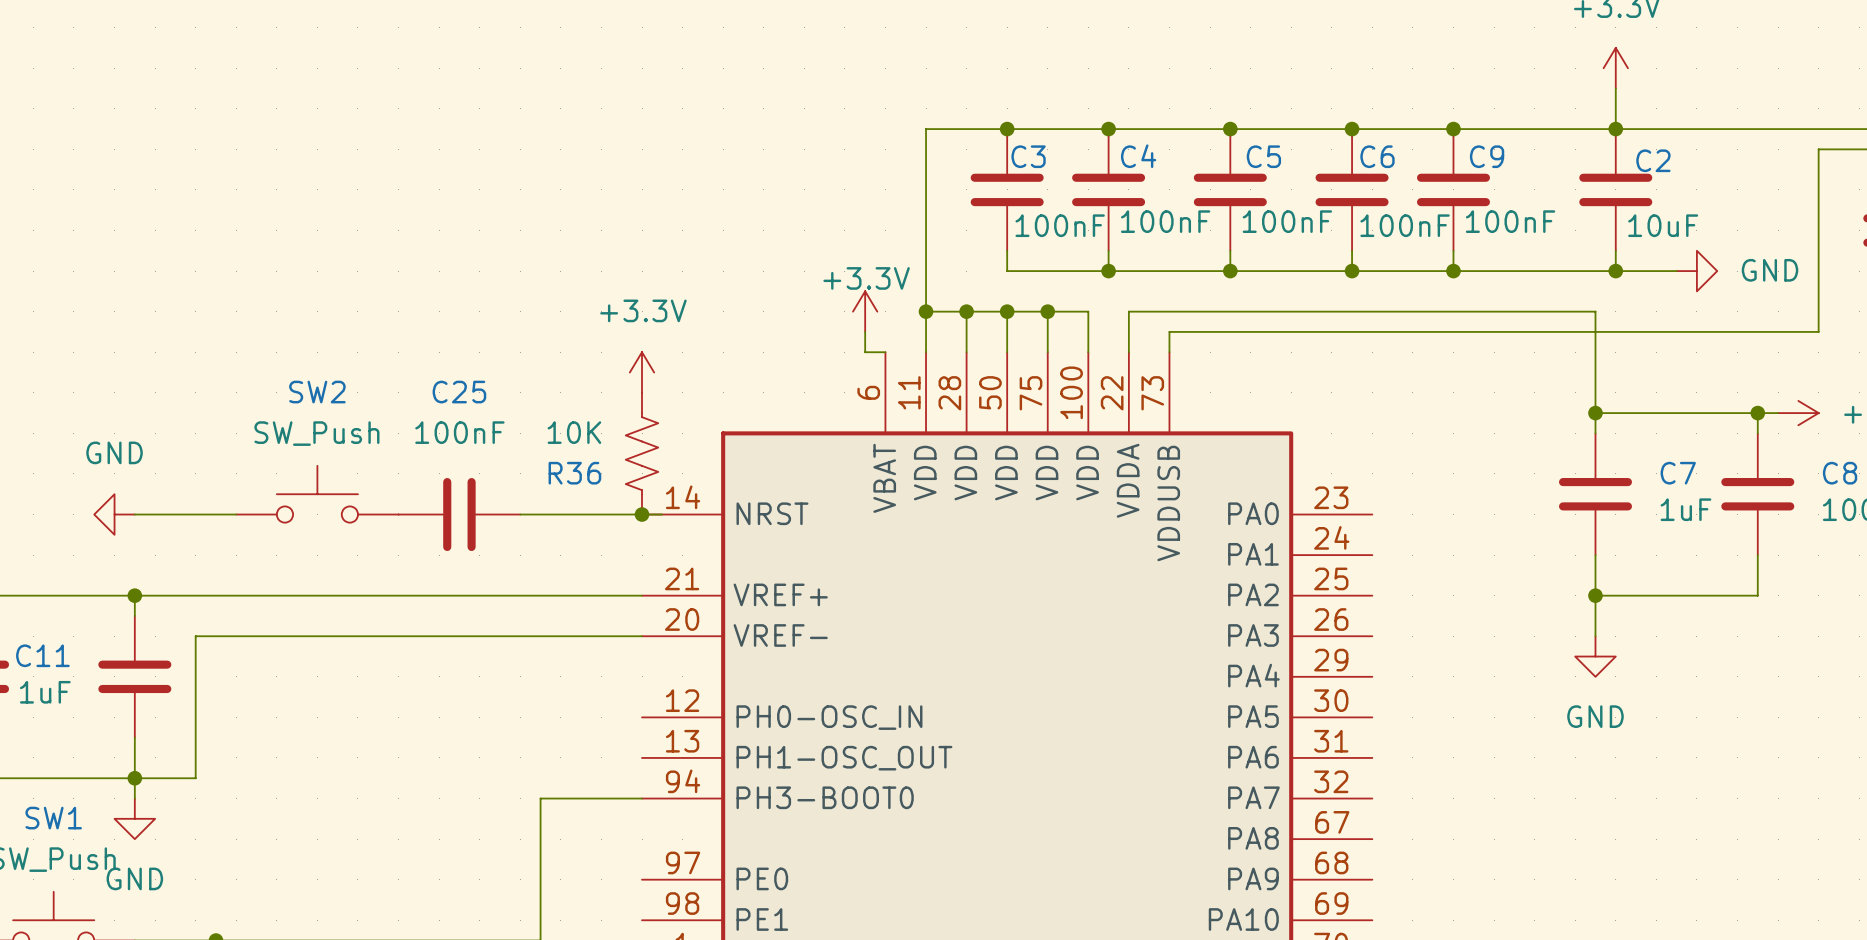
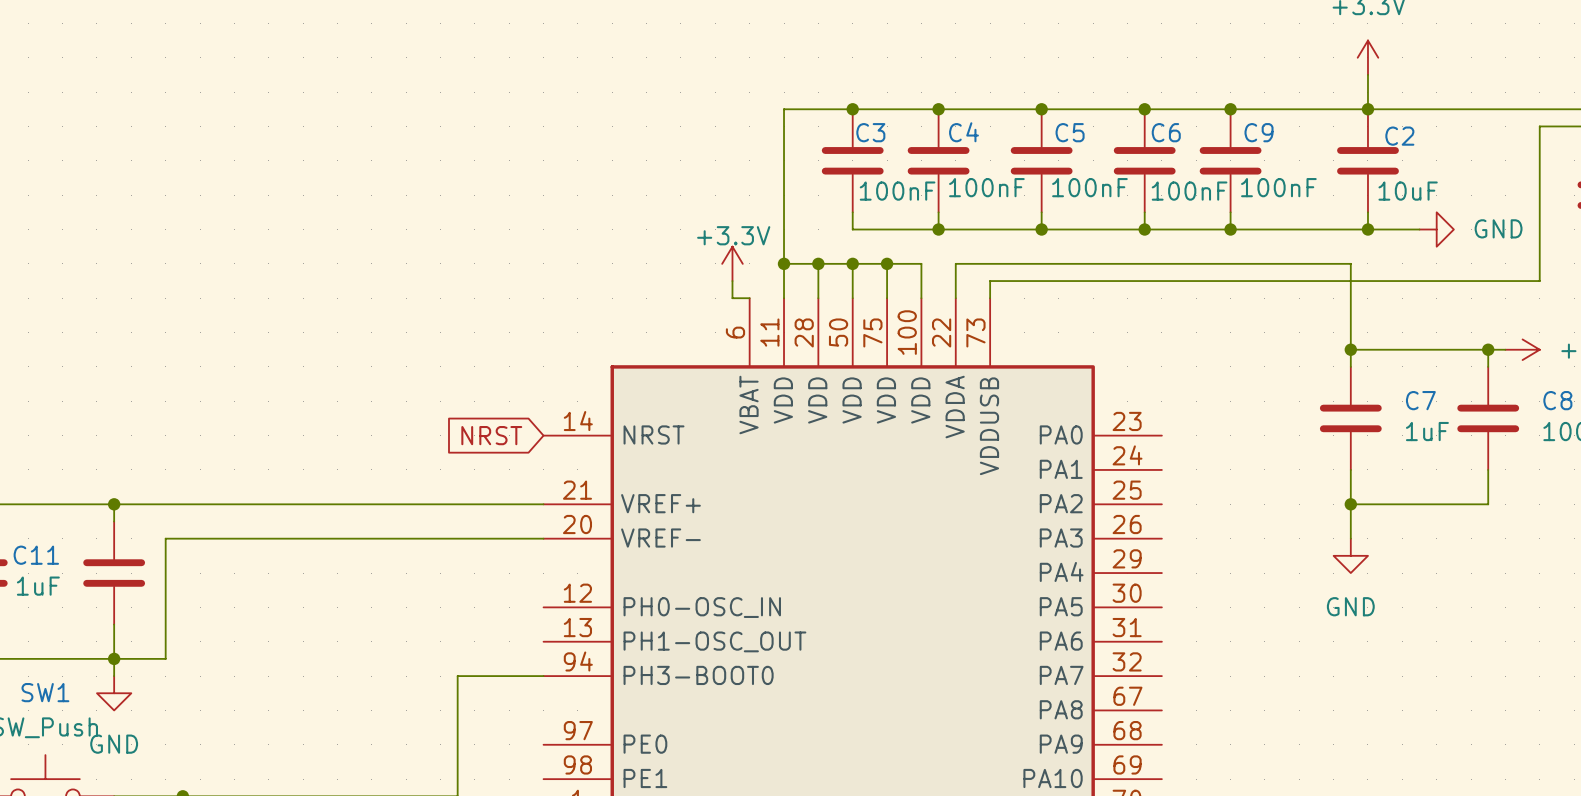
power symbol: +3.3V (642, 372) -> none
R36: 10K (642, 453) -> none
SW2: SW_Push (317, 494) -> none
power symbol: GND (114, 514) -> none
wire: (134, 514) (236, 514) -> none
C25: 100nF (459, 514) -> none
wire: (520, 514) (662, 514) -> none
global label: none -> NRST (491, 435)
junction: (642, 514) -> none

